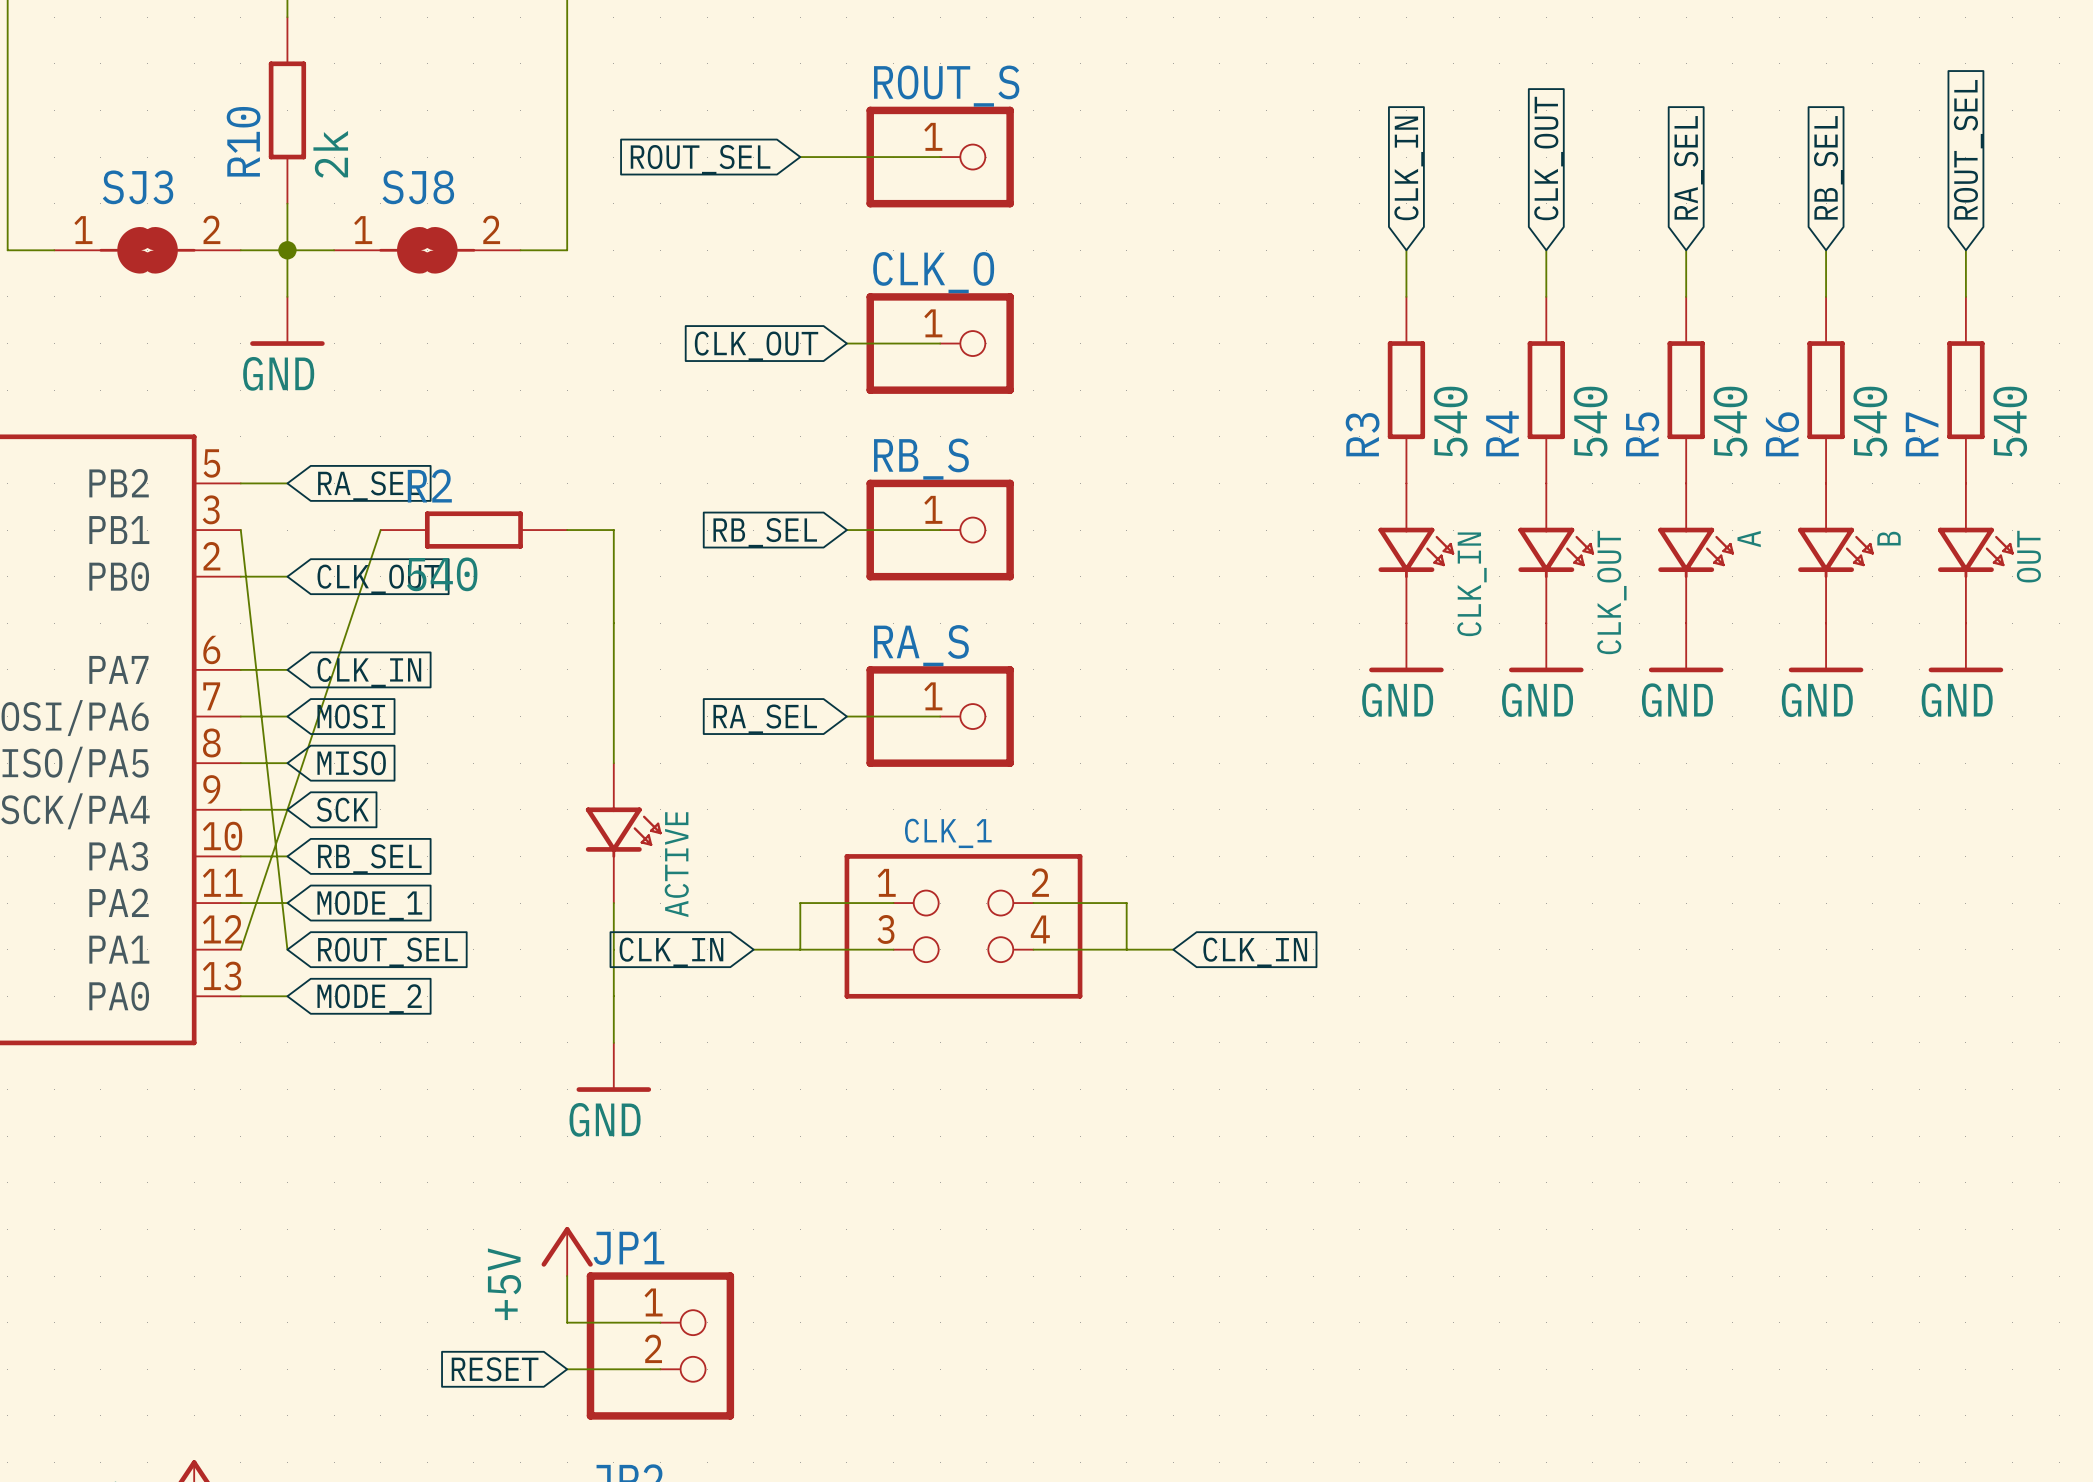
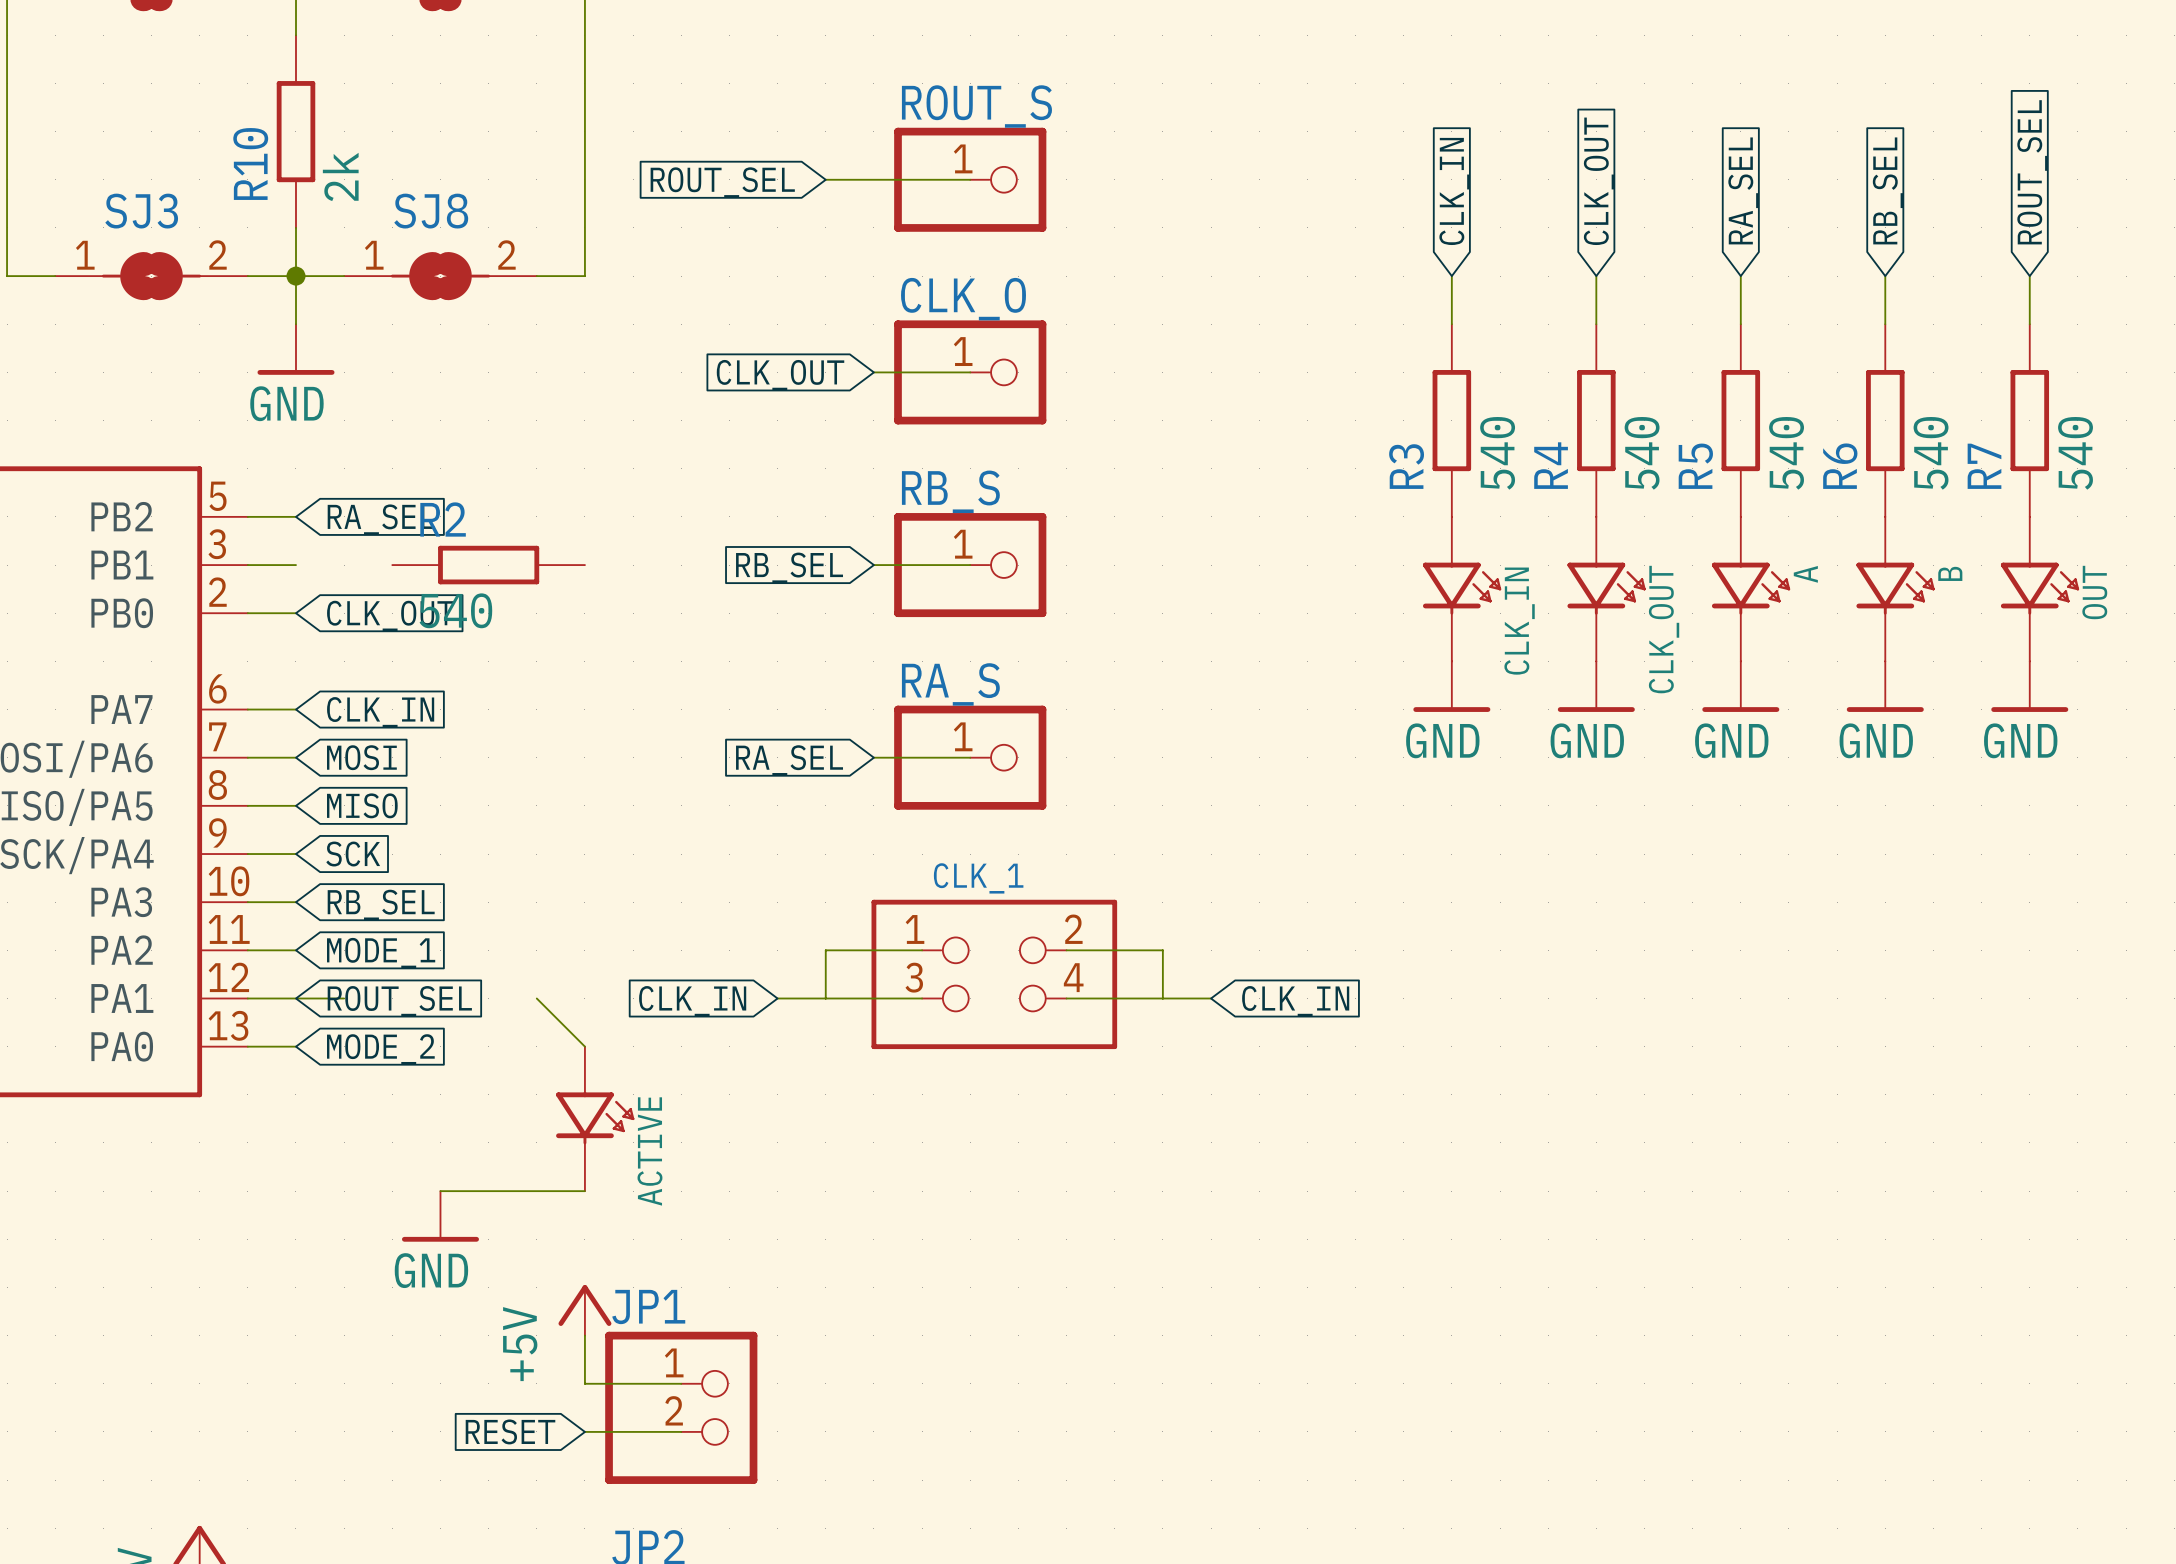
wire: (240, 530) (287, 949) -> (247, 565) (295, 565)
wire: (380, 530) (240, 949) -> (344, 998) (247, 998)
wire: (567, 530) (613, 530) (613, 763) -> none
ACTIVE position: (623, 833) -> (595, 1118)
wire: (613, 903) (613, 1042) -> none
wire: none -> (536, 998) (584, 1046)
power symbol position: GND (613, 1067) -> GND (440, 1216)
wire: none -> (440, 1191) (584, 1191)

